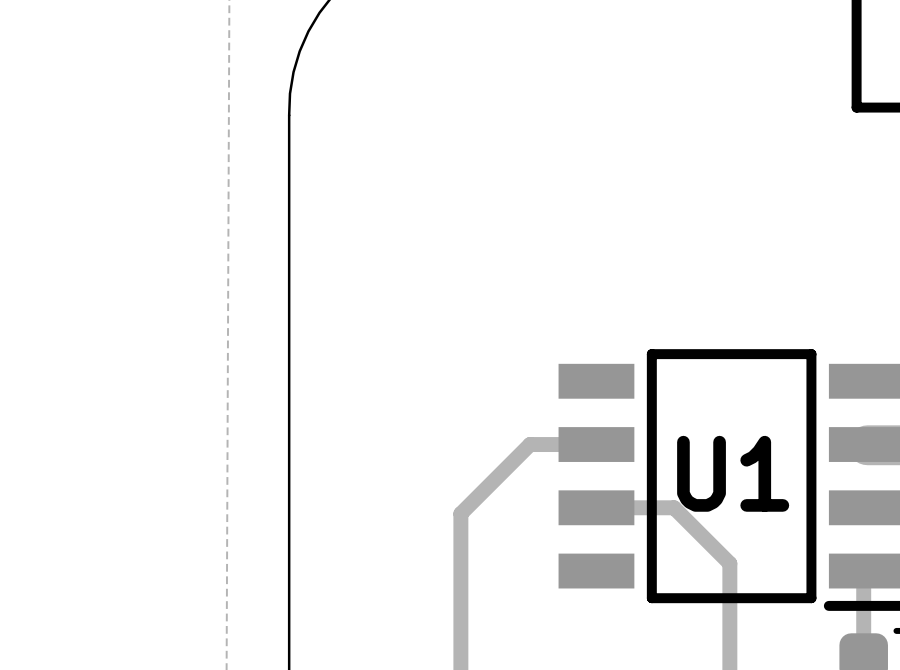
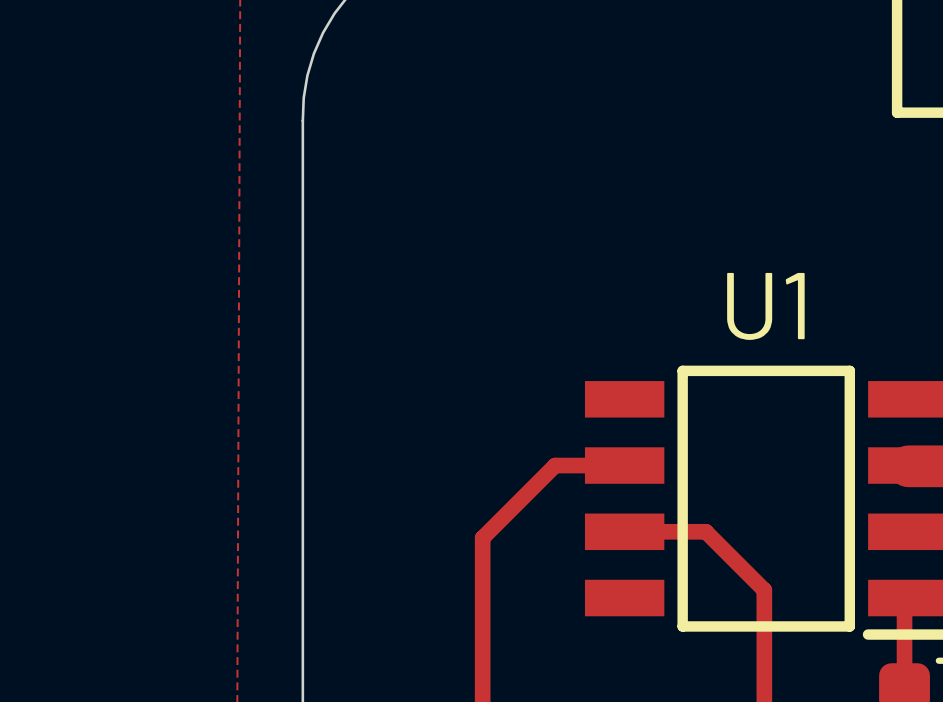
U1 name position: U1 (733, 473) -> U1 (765, 306)

